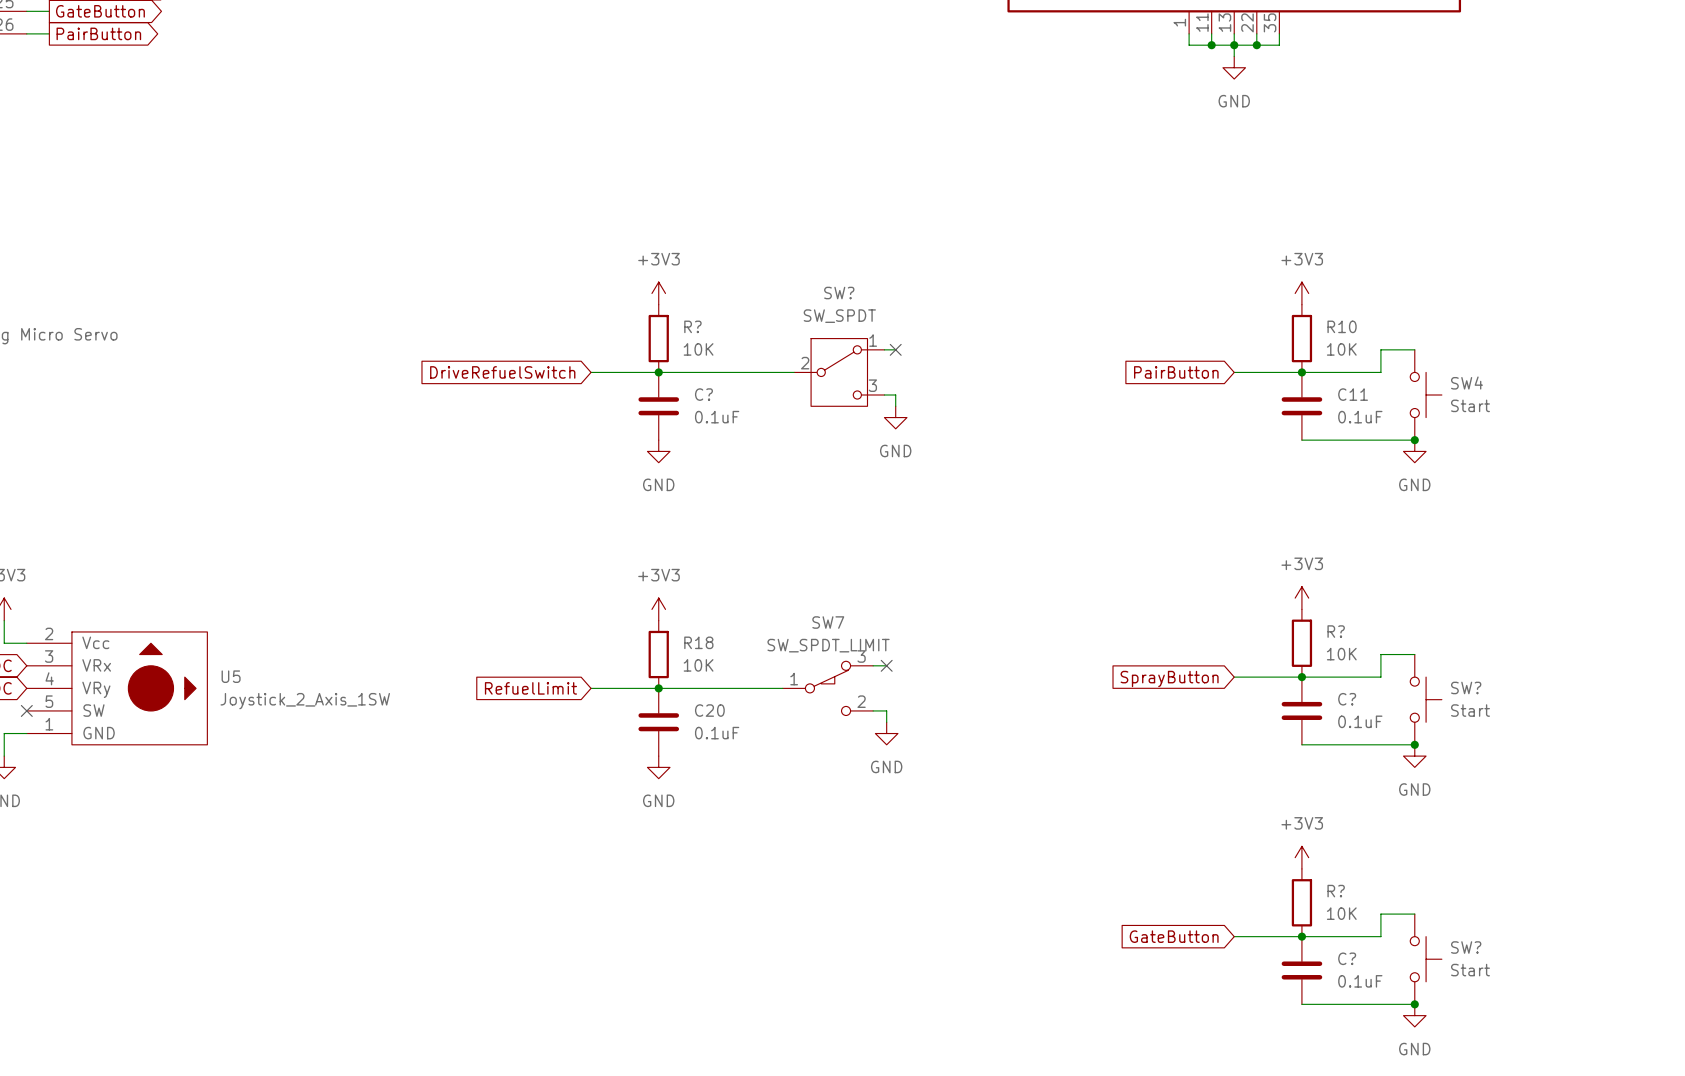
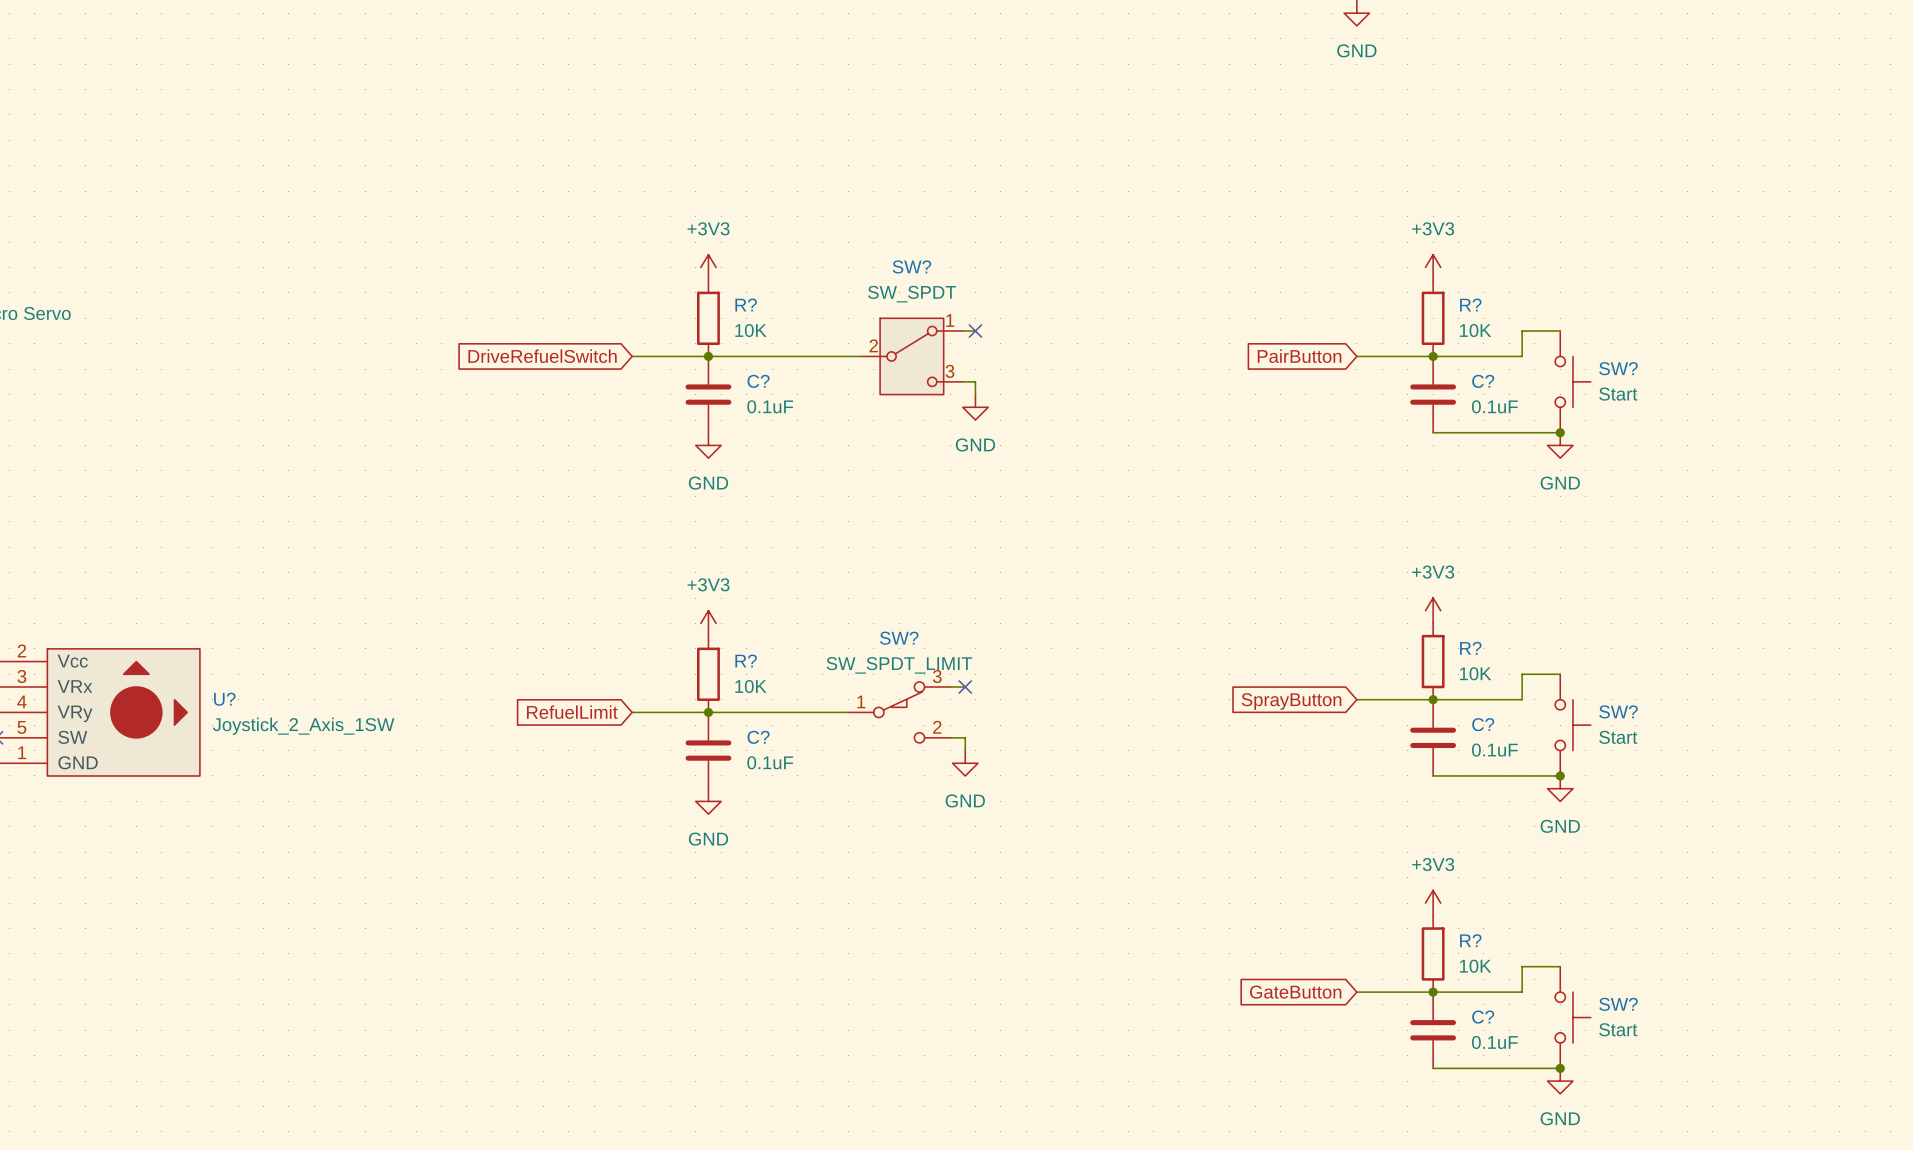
R10 name: R10 (1342, 326) -> R? (1470, 305)
SW4 name: SW4 (1466, 383) -> SW? (1618, 368)
C11 name: C11 (1353, 394) -> C? (1483, 381)
SW7 name: SW7 (828, 622) -> SW? (899, 638)
R18 name: R18 (698, 642) -> R? (746, 660)
U5 name: U5 (231, 676) -> U? (224, 699)
C20 name: C20 (709, 710) -> C? (758, 737)

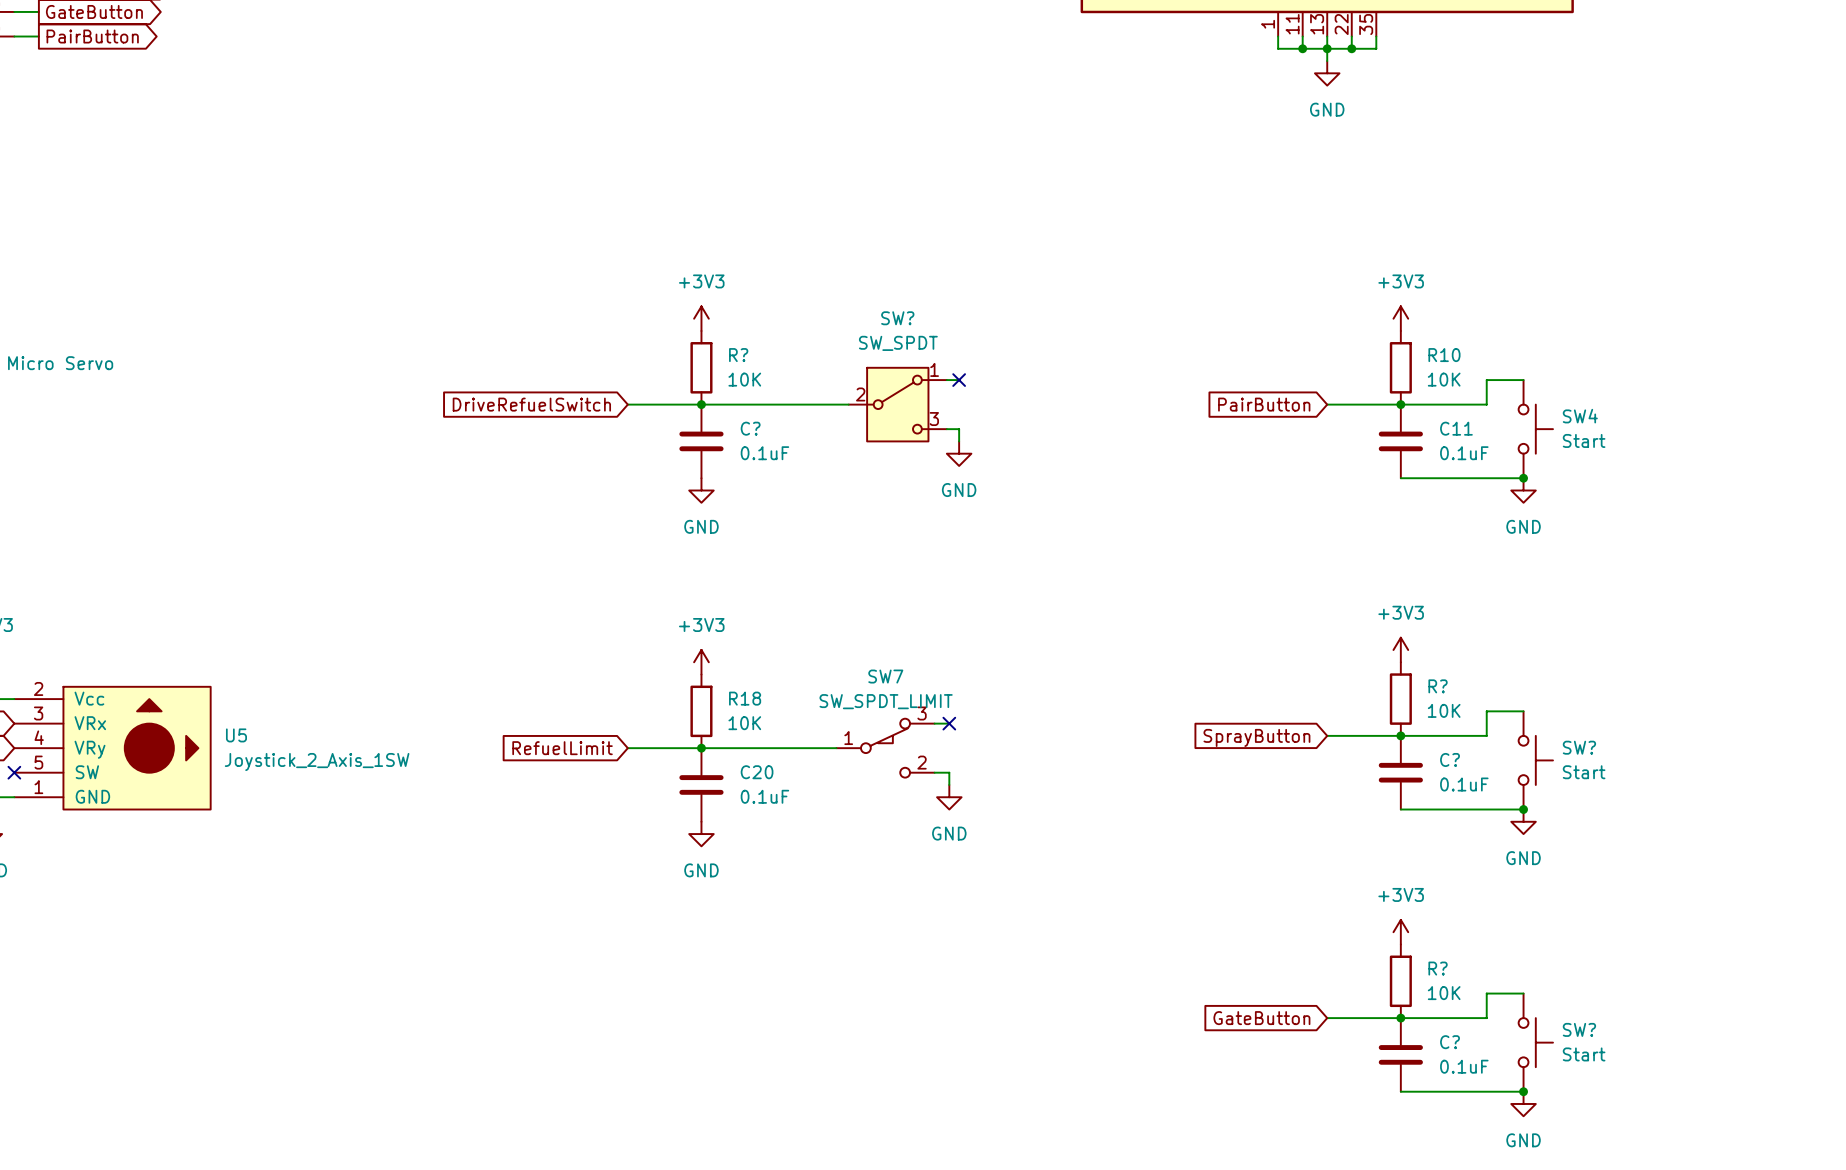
R? name: R? (1470, 305) -> R10 (1444, 355)
SW? name: SW? (1618, 368) -> SW4 (1580, 416)
C? name: C? (1483, 381) -> C11 (1456, 428)
SW? name: SW? (899, 638) -> SW7 (885, 676)
R? name: R? (746, 660) -> R18 (745, 698)
U? name: U? (224, 699) -> U5 (236, 735)
C? name: C? (758, 737) -> C20 (757, 772)

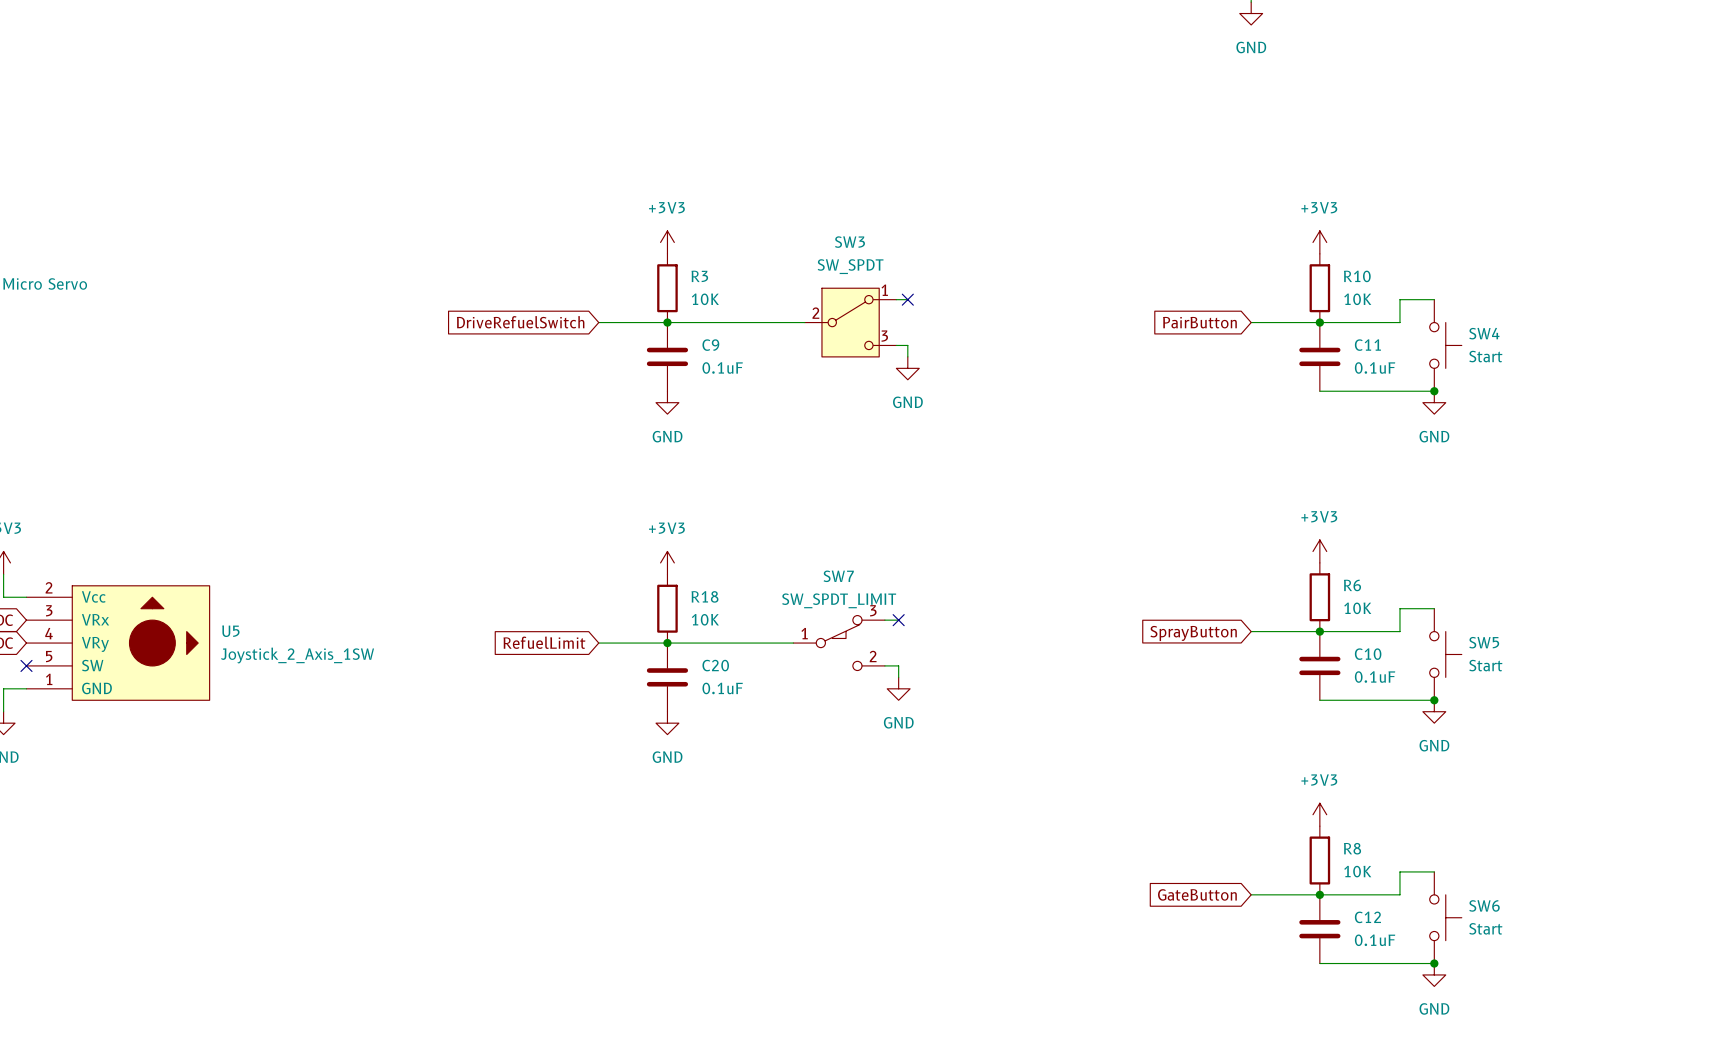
SW? name: SW? (897, 318) -> SW3 (849, 242)
R? name: R? (738, 355) -> R3 (699, 276)
C? name: C? (750, 428) -> C9 (710, 345)
R? name: R? (1438, 686) -> R6 (1352, 585)
SW? name: SW? (1579, 747) -> SW5 (1484, 642)
C? name: C? (1450, 759) -> C10 (1368, 654)
R? name: R? (1438, 968) -> R8 (1352, 848)
SW? name: SW? (1579, 1029) -> SW6 (1484, 905)
C? name: C? (1450, 1042) -> C12 (1367, 917)

